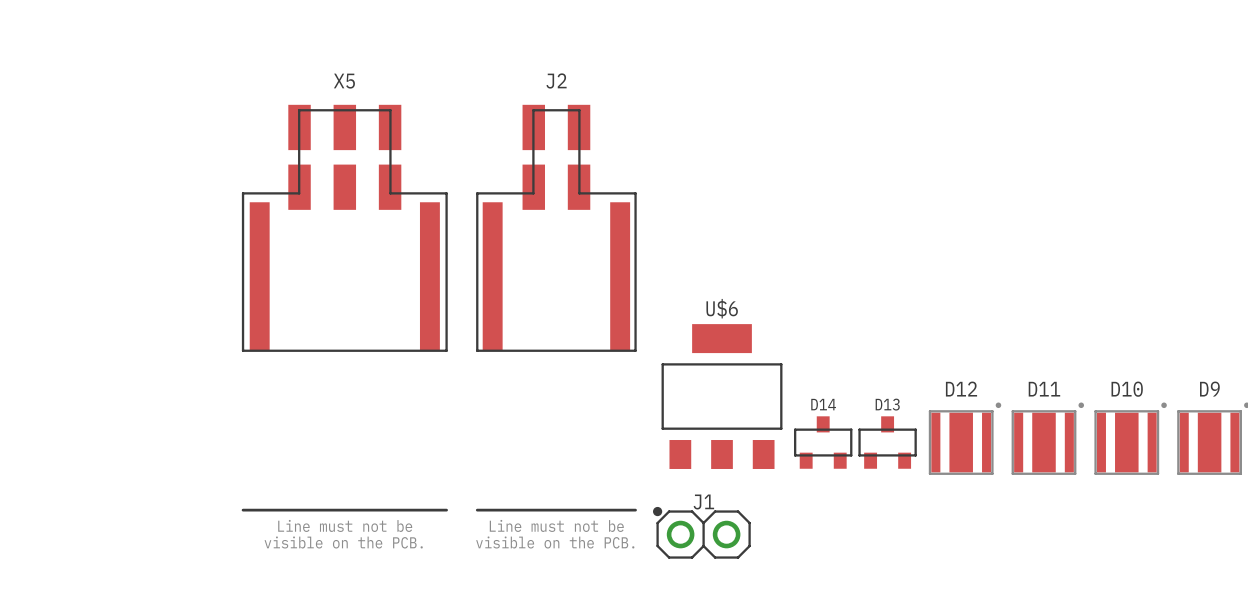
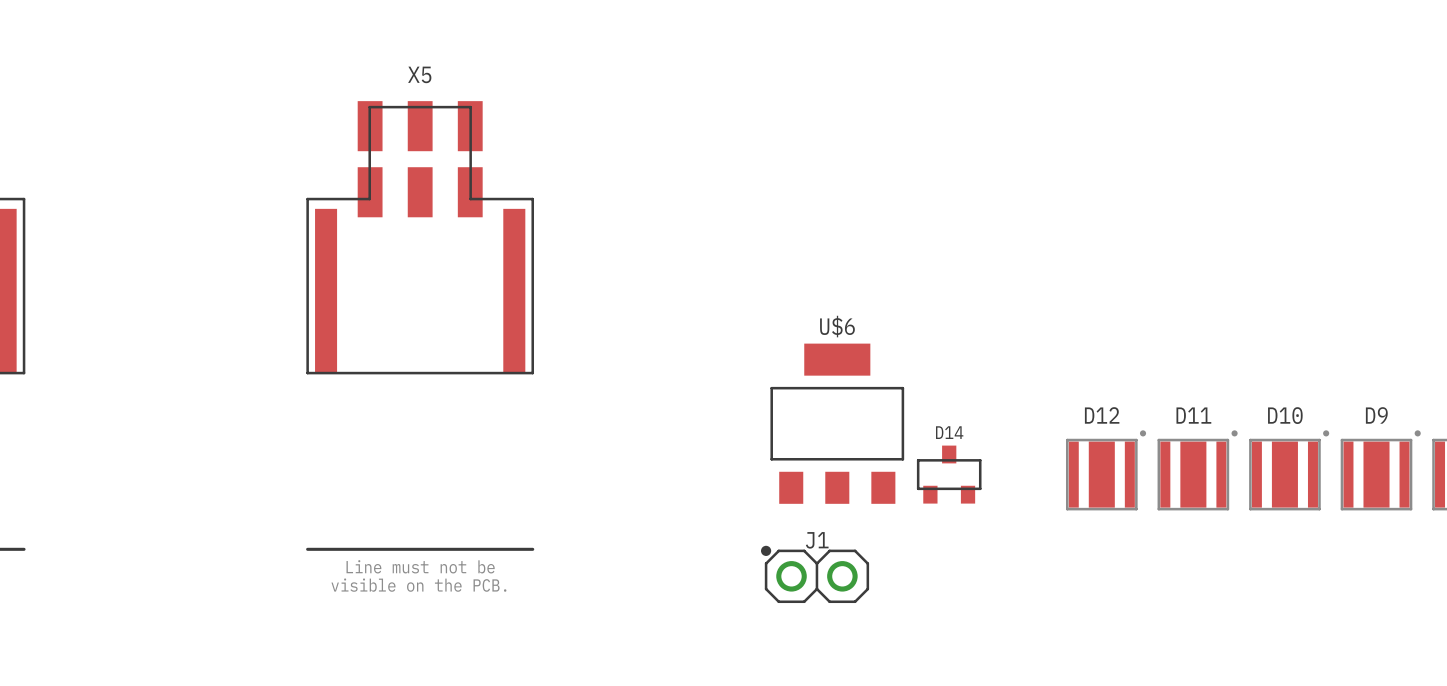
J2: (556, 308) -> none
D13: (887, 442) -> none

